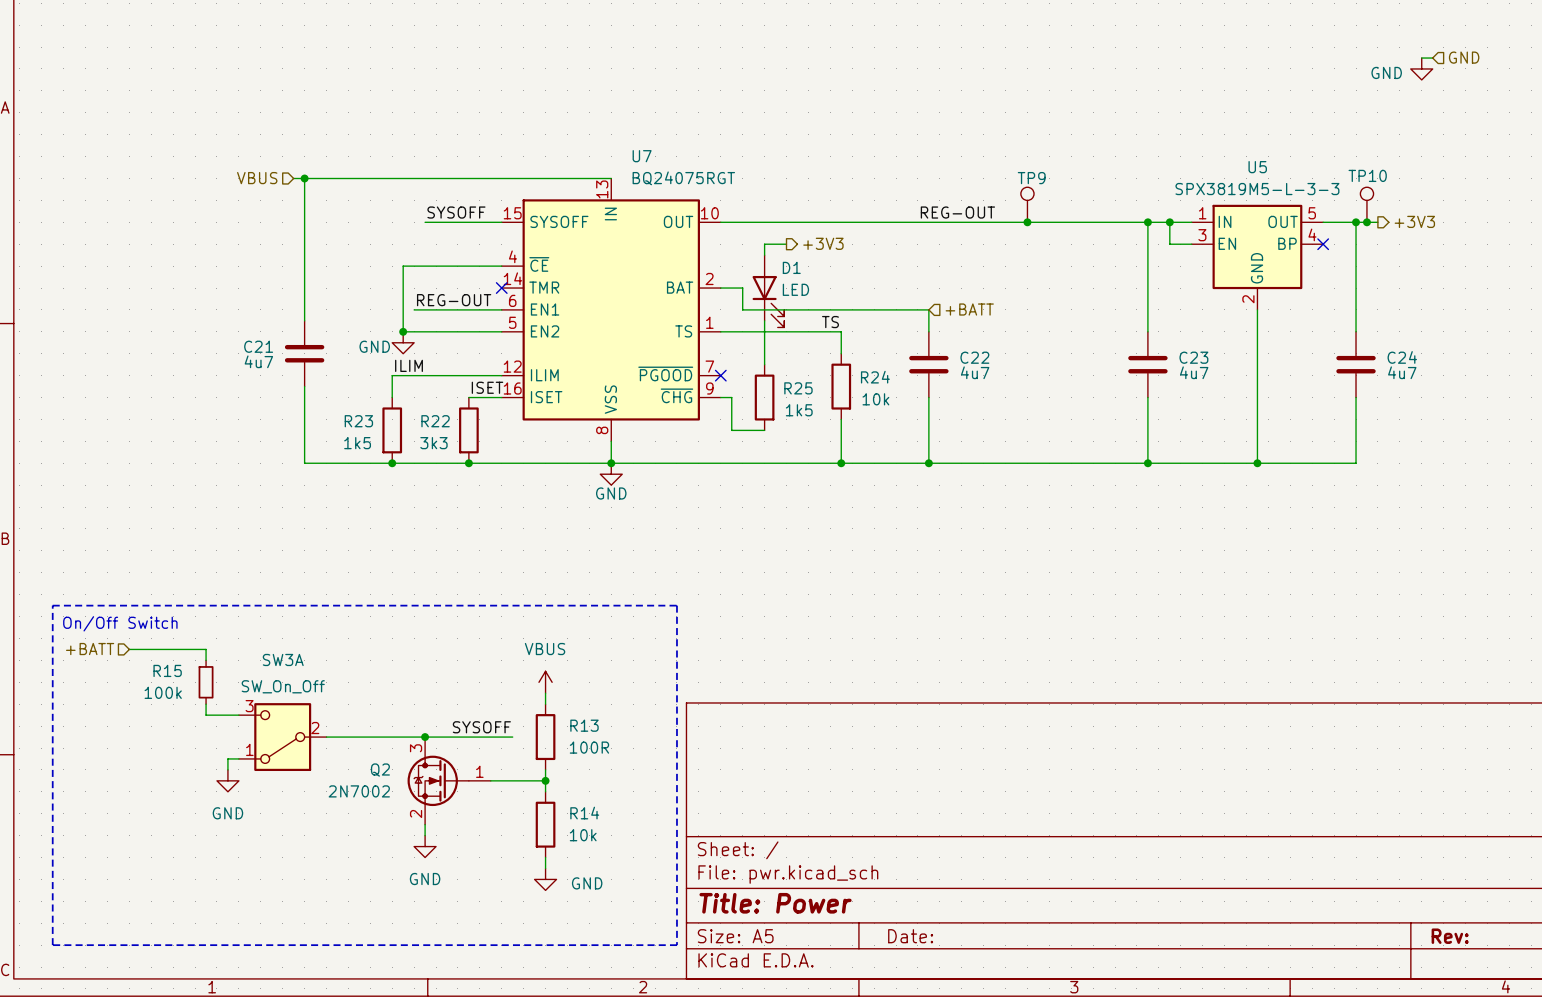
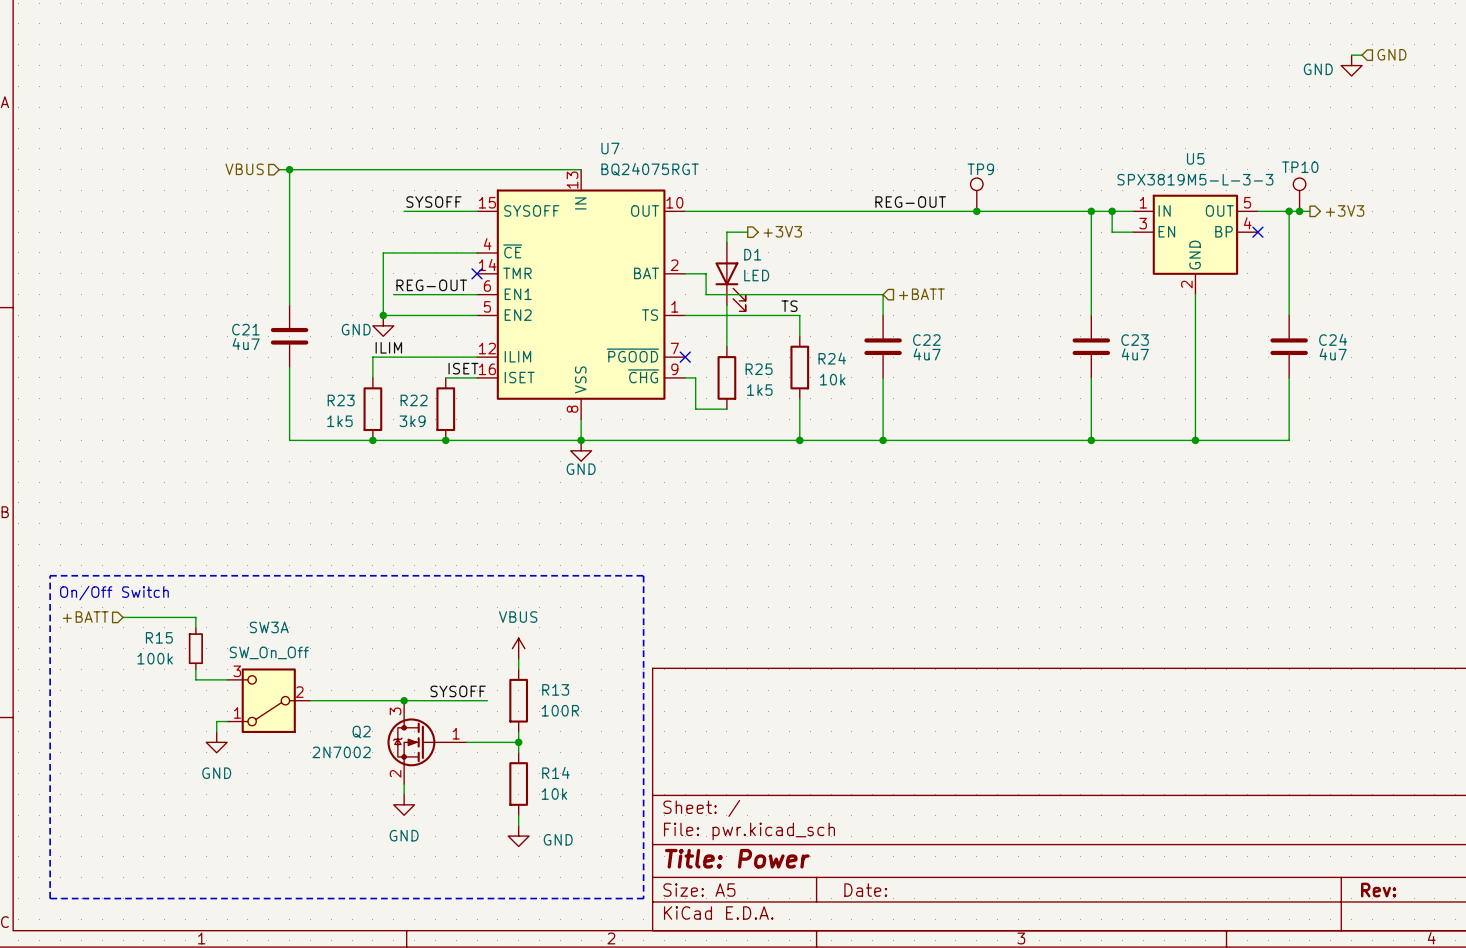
R22 value: 3k3 (433, 443) -> 3k9 (412, 421)

